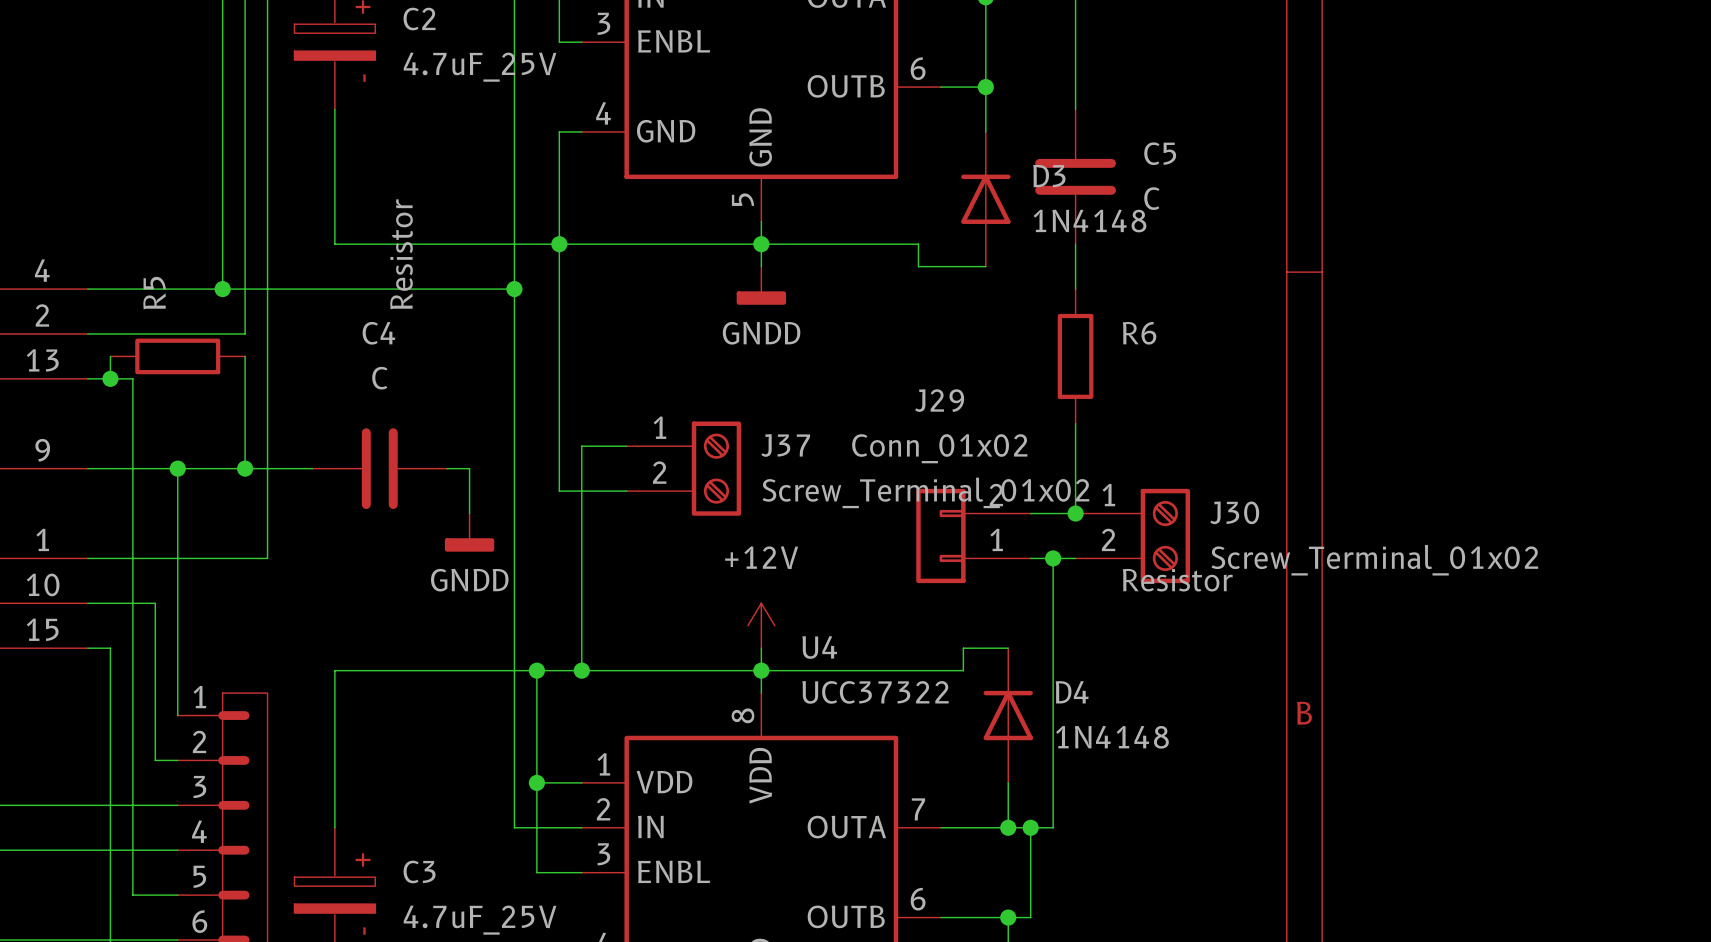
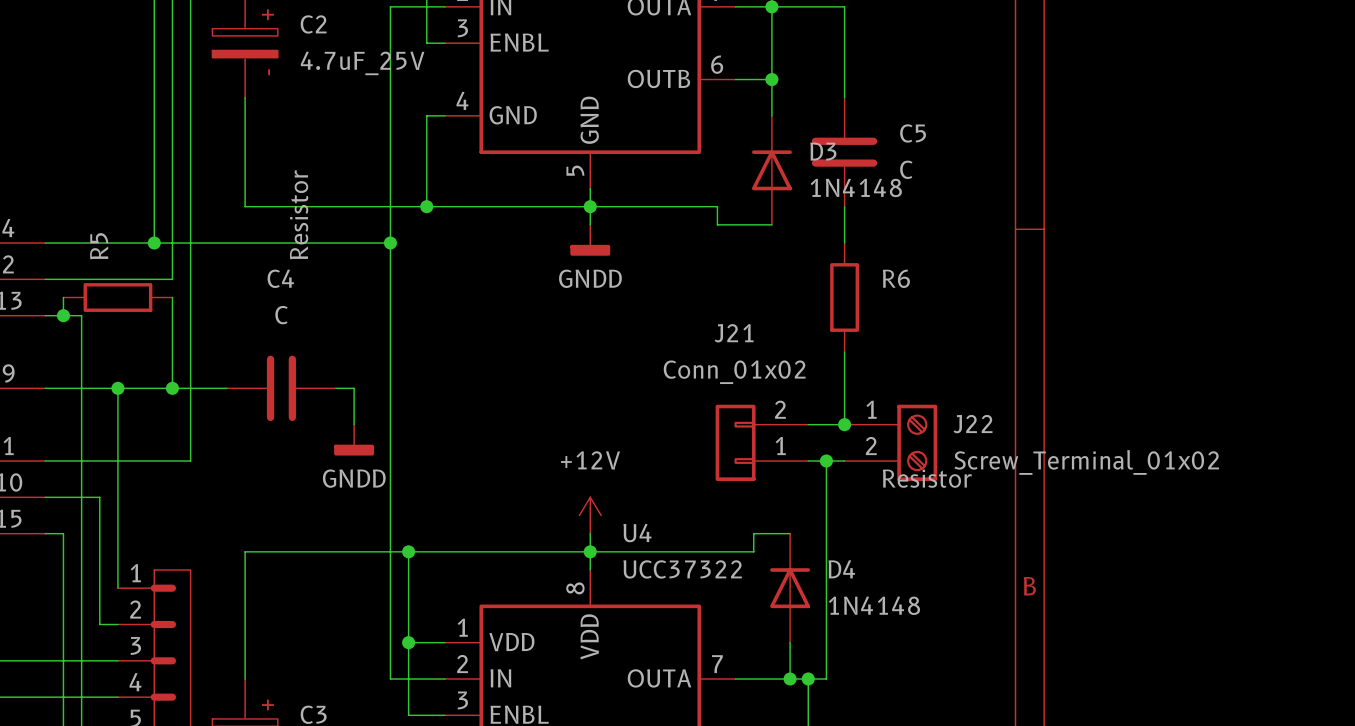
wire: (559, 244) (559, 491) (626, 491) -> none
J29 name: J29 (939, 400) -> J21 (734, 333)
wire: (626, 446) (581, 446) (581, 670) -> none
J37: Screw_Terminal_01x02 (683, 468) -> none
J30 name: J30 (1234, 512) -> J22 (973, 424)
junction: (581, 670) -> none

